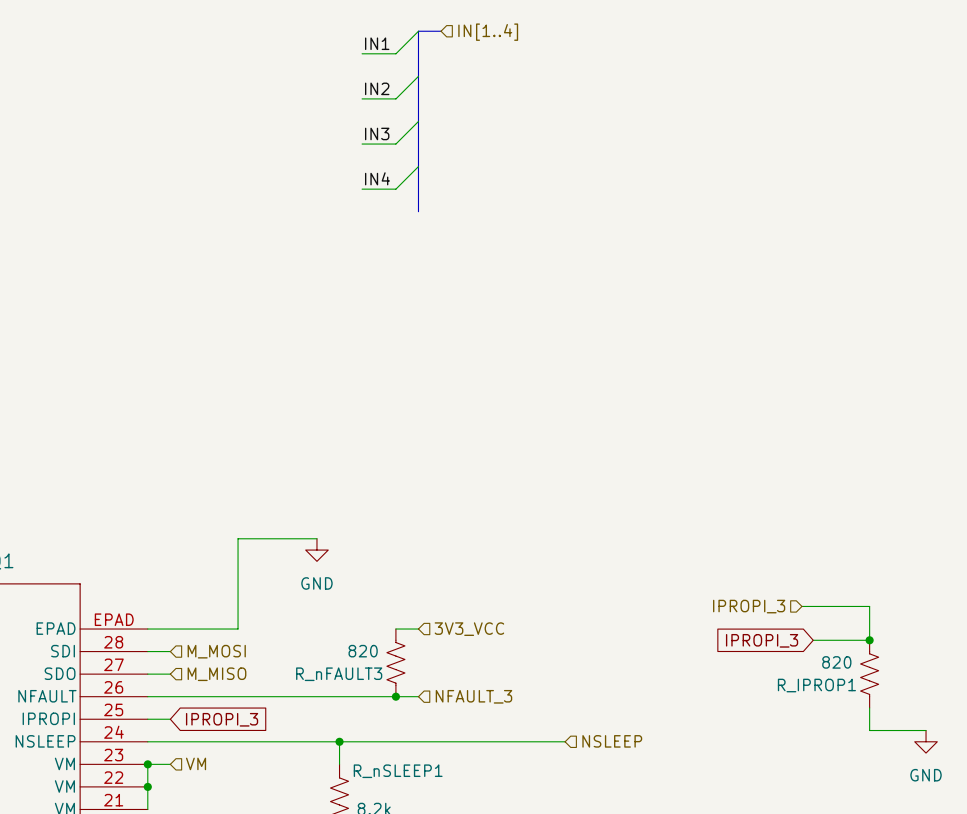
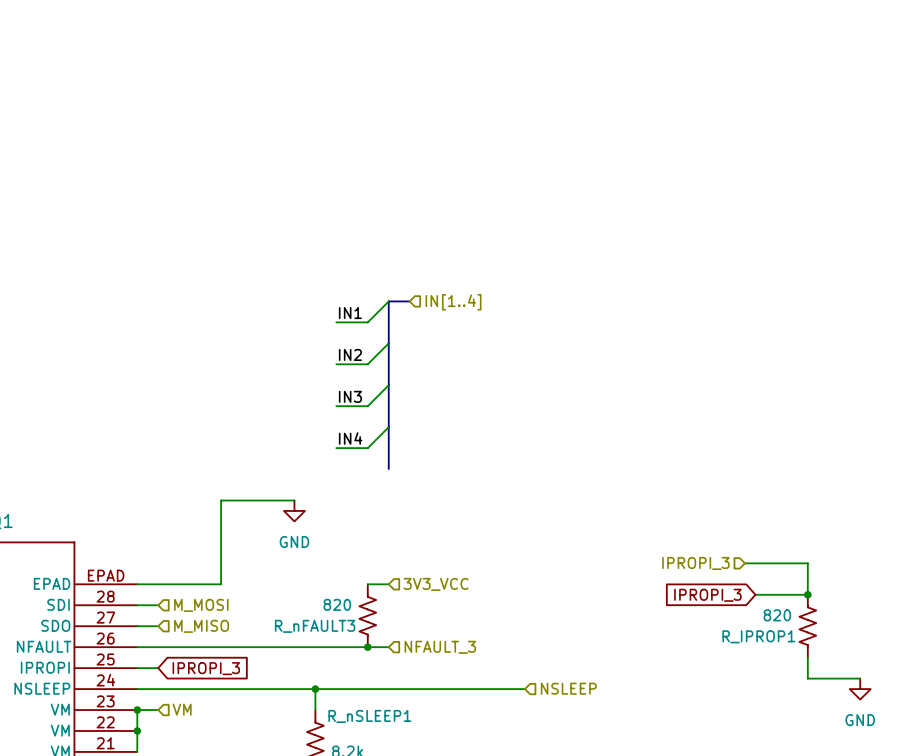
wire: (418, 31) (395, 53) (362, 53) -> none
bus: (441, 31) (418, 31) (418, 211) -> none
hierarchical label: IN[1..4] (488, 32) -> none
label: IN1 (377, 43) -> none
wire: (418, 76) (395, 98) (362, 98) -> none
label: IN2 (377, 88) -> none
wire: (418, 121) (395, 144) (362, 144) -> (388, 301) (367, 322) (336, 322)
label: IN3 (377, 133) -> none
wire: (418, 166) (395, 189) (362, 189) -> (388, 343) (367, 364) (336, 364)
label: IN4 (377, 178) -> none
bus: none -> (409, 301) (388, 301) (388, 469)
hierarchical label: none -> IN[1..4] (453, 302)
label: none -> IN1 (350, 313)
label: none -> IN2 (350, 354)
wire: none -> (388, 385) (367, 406) (336, 406)
label: none -> IN3 (350, 396)
wire: none -> (388, 427) (367, 448) (336, 448)
label: none -> IN4 (350, 438)

